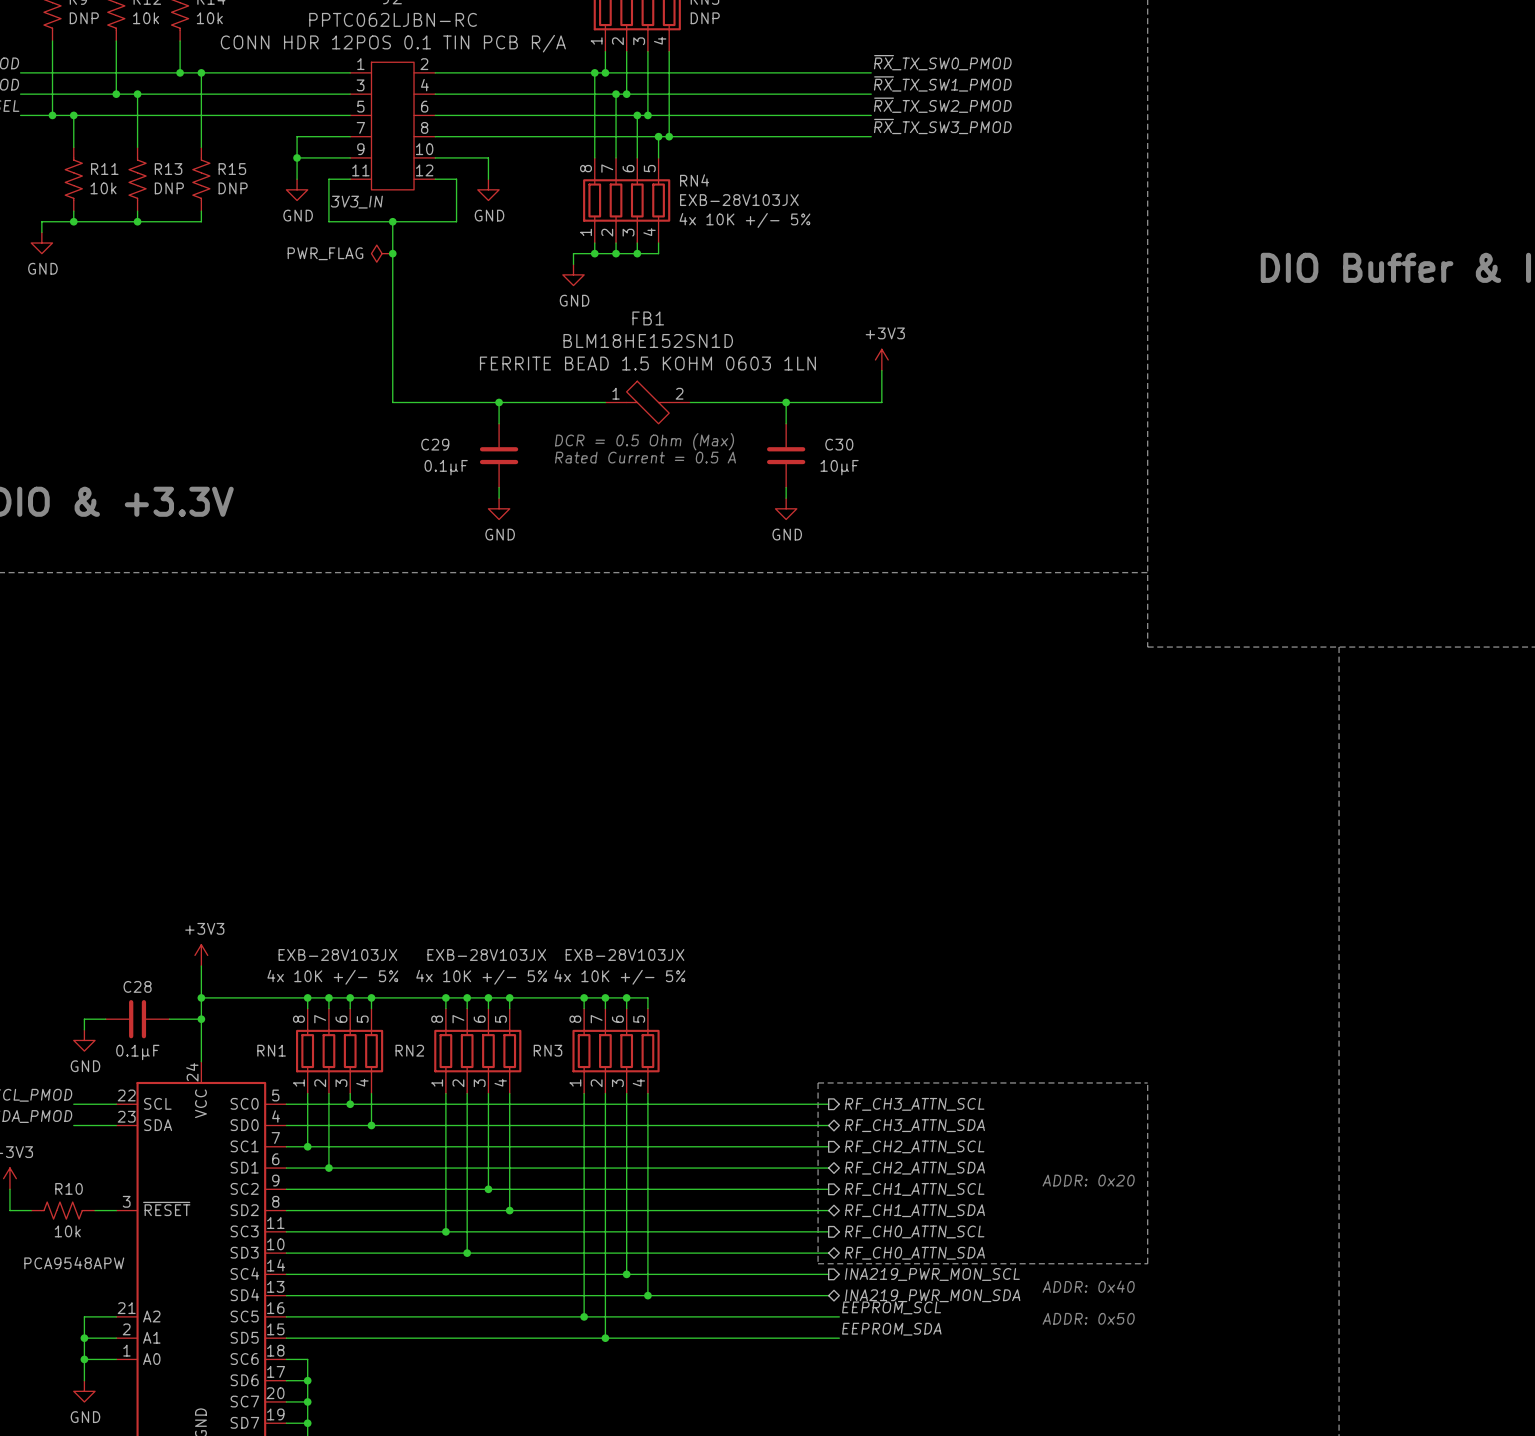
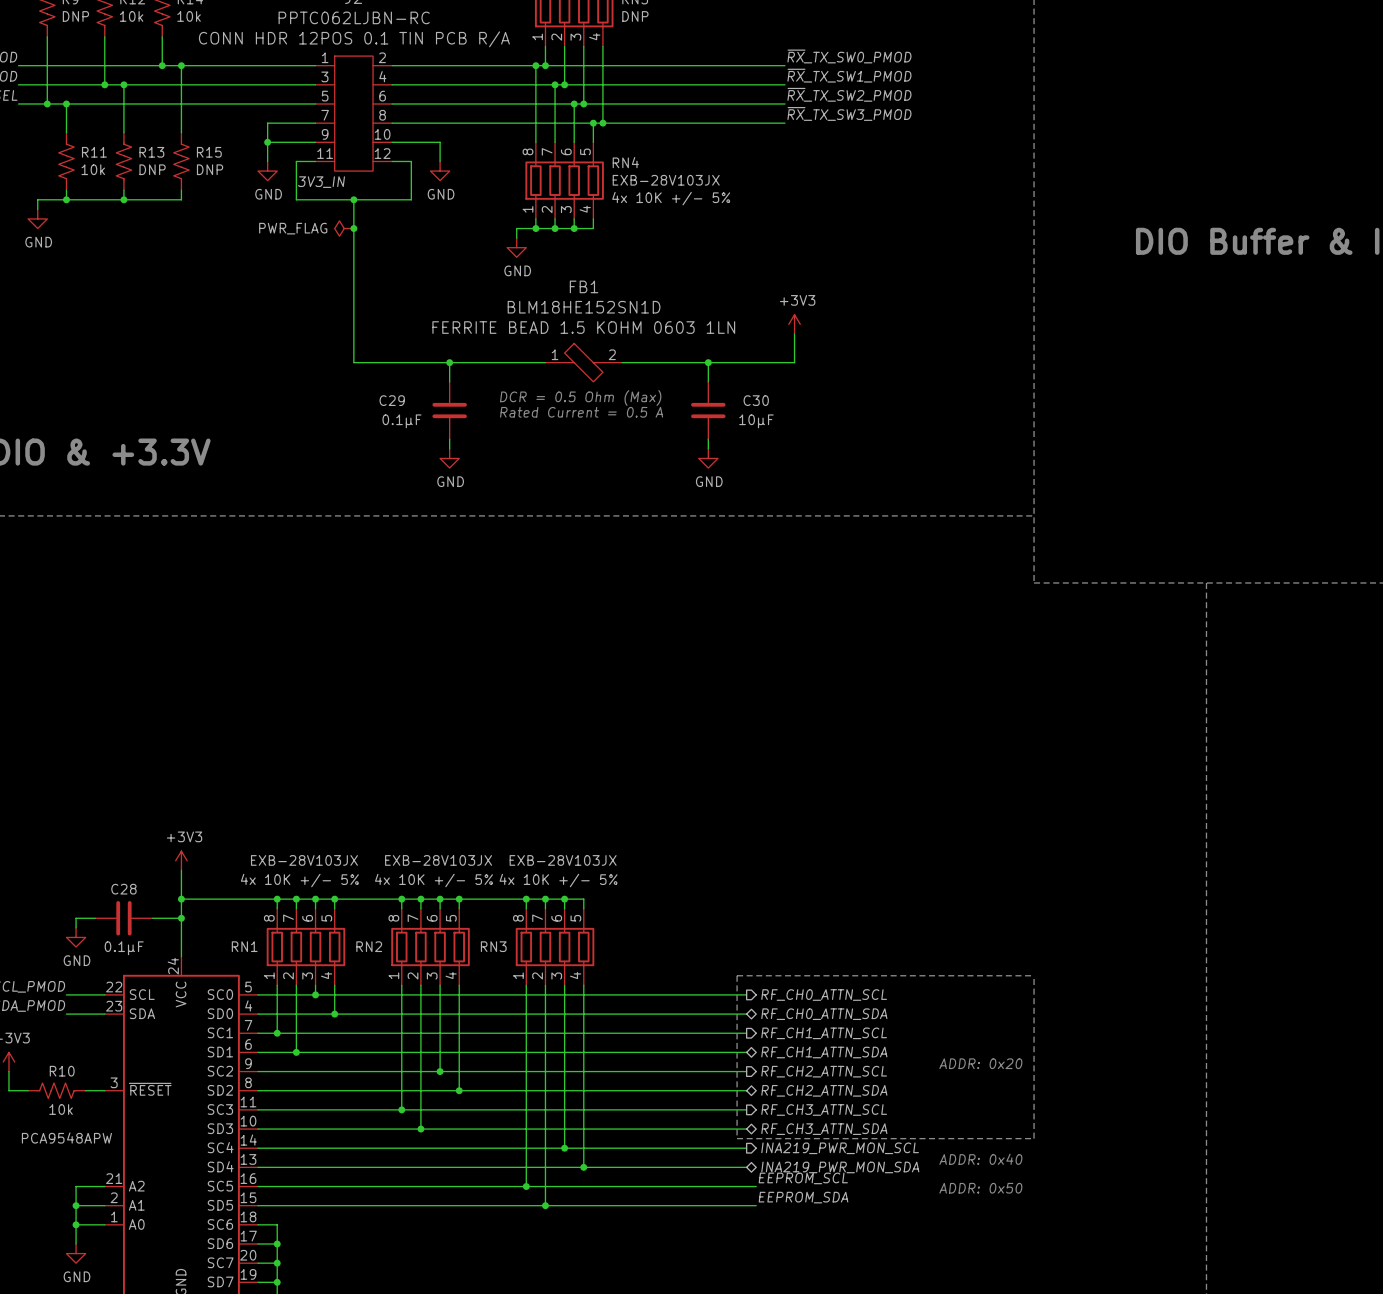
hierarchical label: RF_CH3_ATTN_SCL (914, 1104) -> RF_CH0_ATTN_SCL (824, 995)
hierarchical label: RF_CH3_ATTN_SDA (914, 1125) -> RF_CH0_ATTN_SDA (824, 1014)
hierarchical label: RF_CH2_ATTN_SCL (914, 1146) -> RF_CH1_ATTN_SCL (824, 1033)
hierarchical label: RF_CH2_ATTN_SDA (914, 1168) -> RF_CH1_ATTN_SDA (824, 1052)
hierarchical label: RF_CH1_ATTN_SCL (914, 1189) -> RF_CH2_ATTN_SCL (824, 1071)
hierarchical label: RF_CH1_ATTN_SDA (914, 1210) -> RF_CH2_ATTN_SDA (824, 1090)
hierarchical label: RF_CH0_ATTN_SCL (914, 1231) -> RF_CH3_ATTN_SCL (824, 1109)
hierarchical label: RF_CH0_ATTN_SDA (914, 1253) -> RF_CH3_ATTN_SDA (824, 1129)

